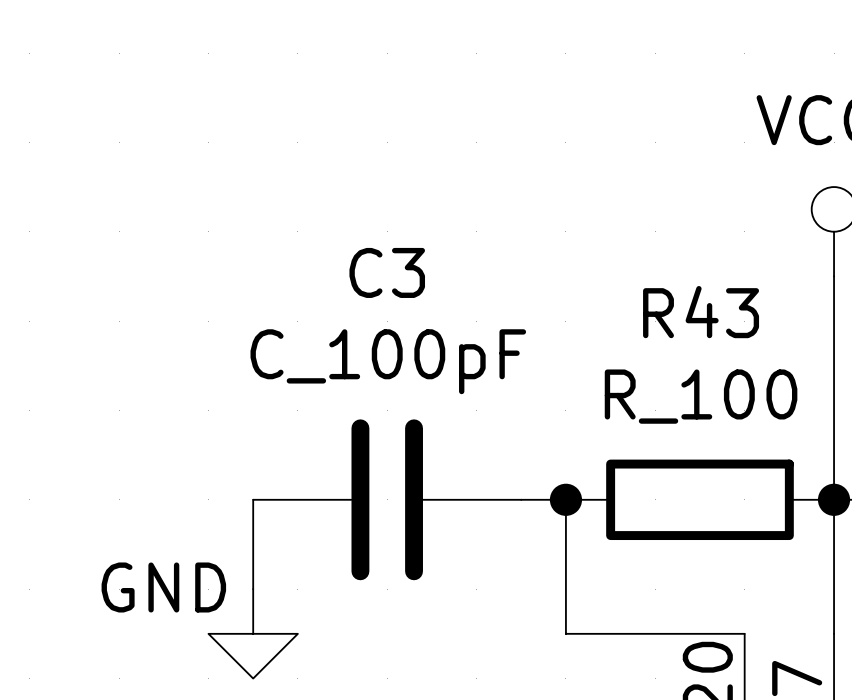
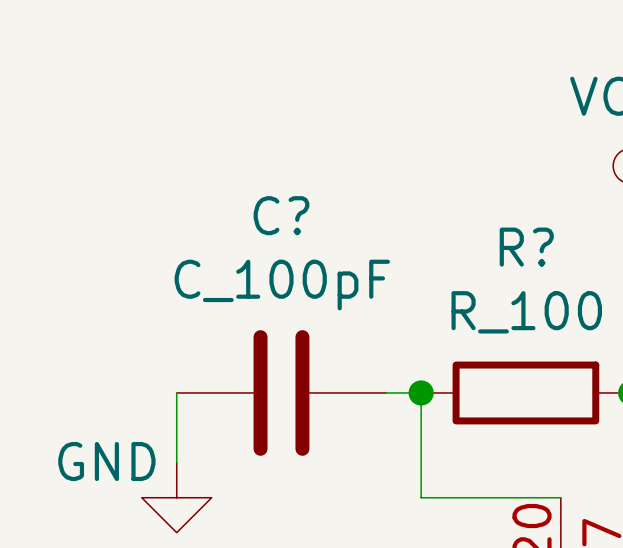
C3 name: C3 (387, 272) -> C? (281, 215)
R43 name: R43 (701, 312) -> R? (526, 247)

